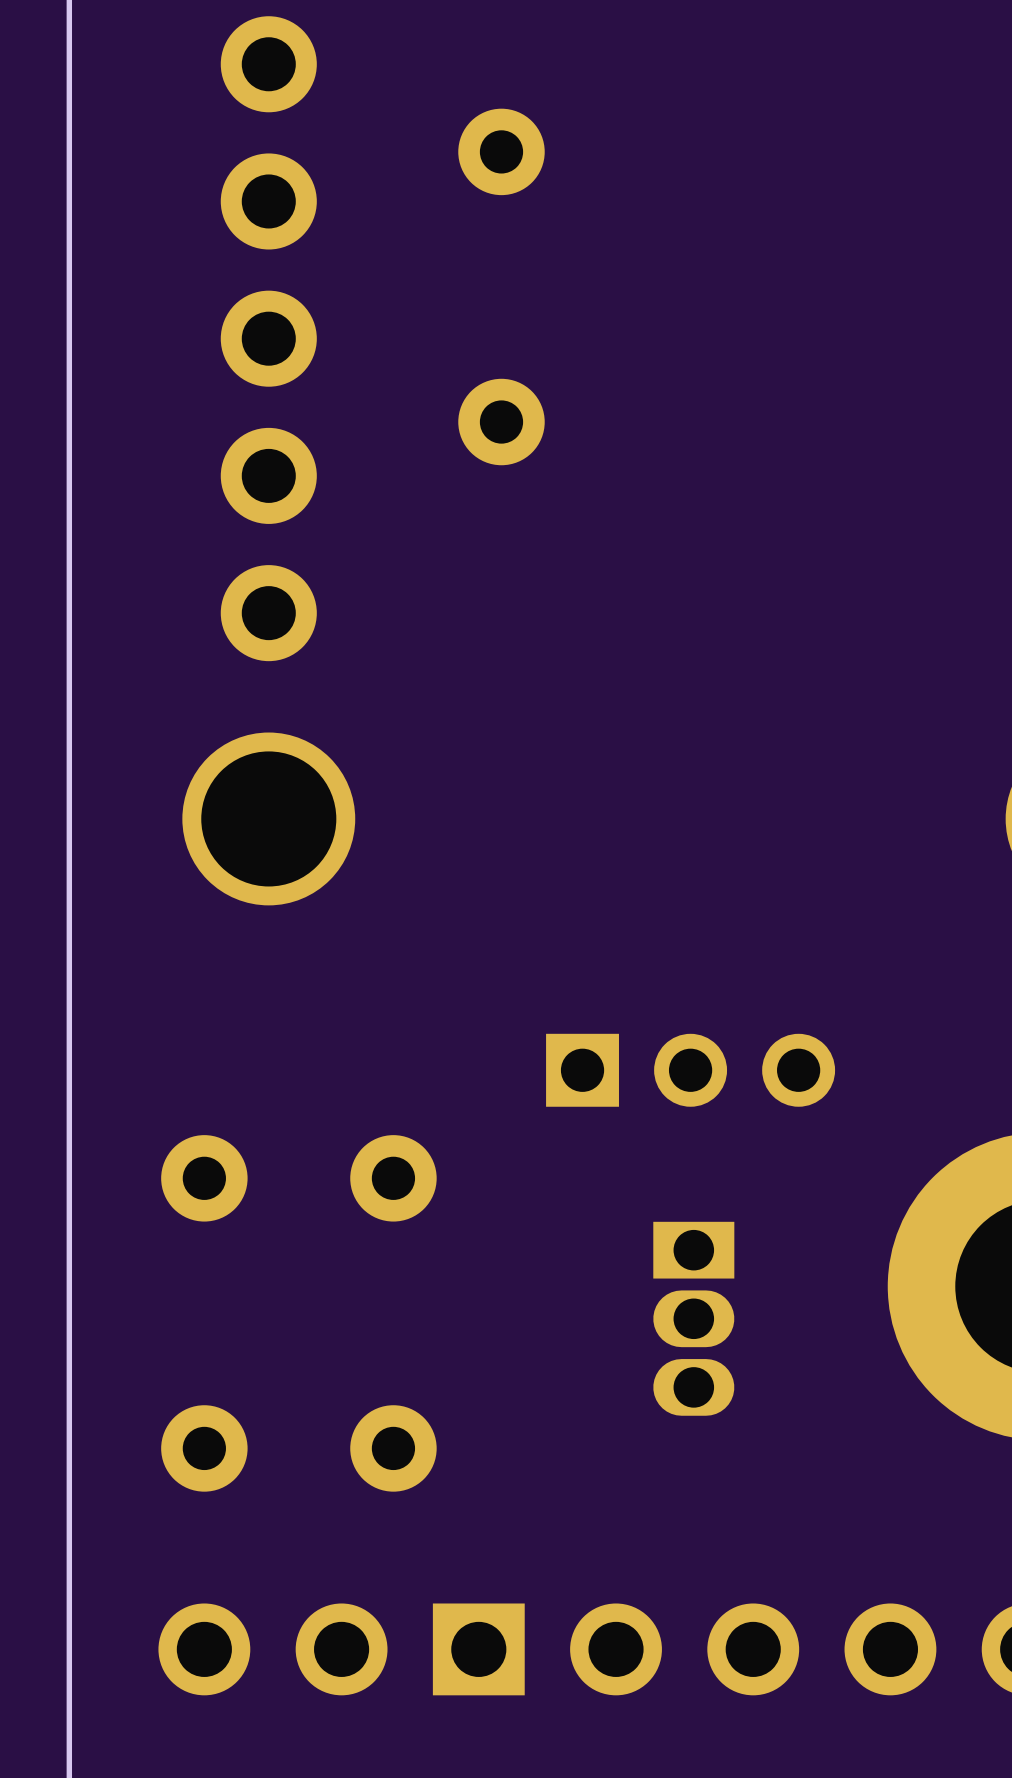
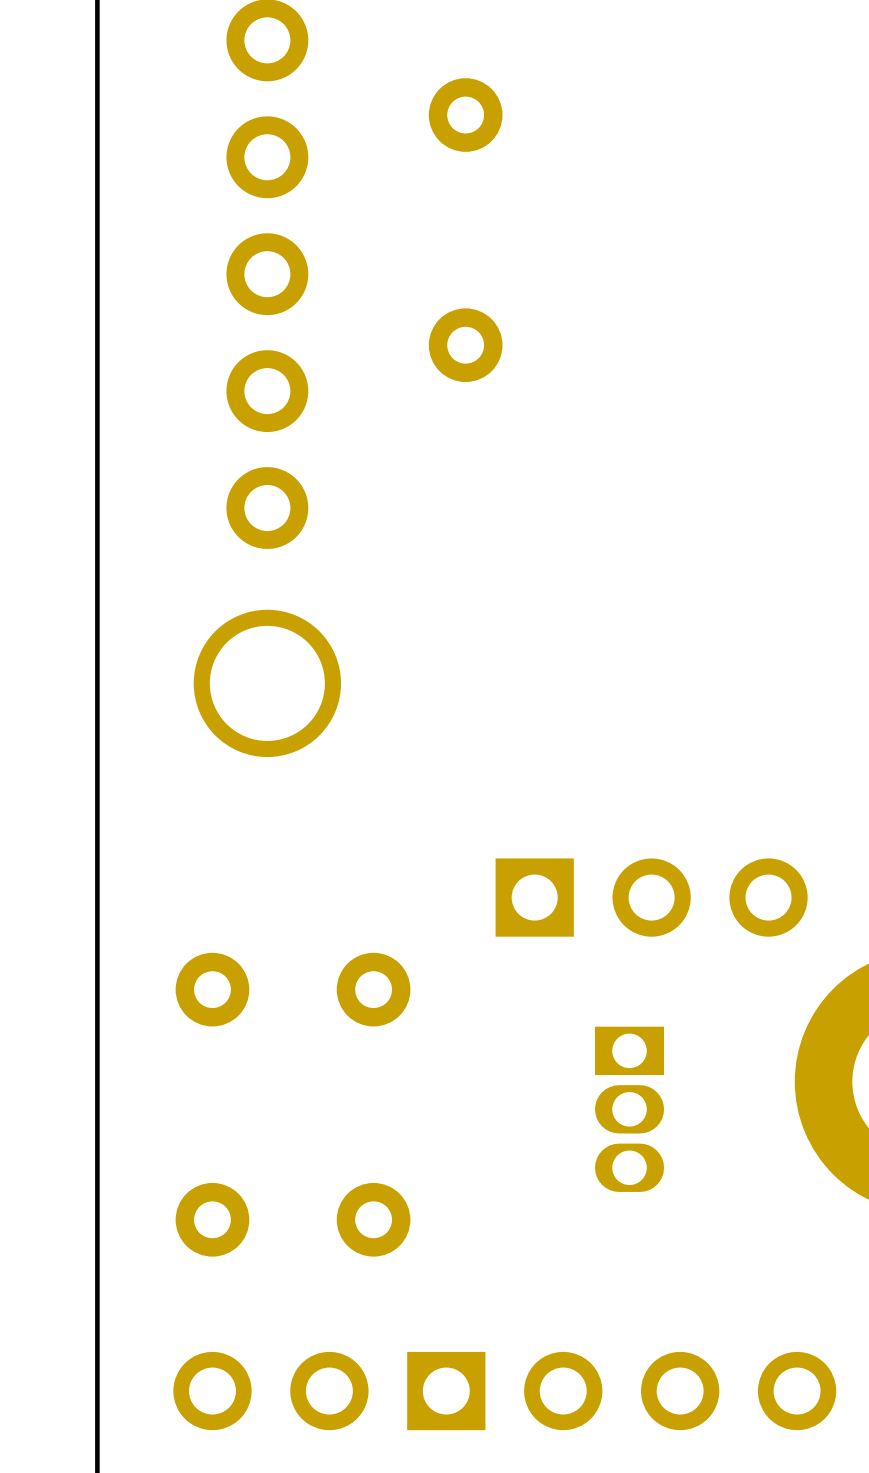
part footprint: [546, 1033, 836, 1107] -> [495, 858, 808, 937]

